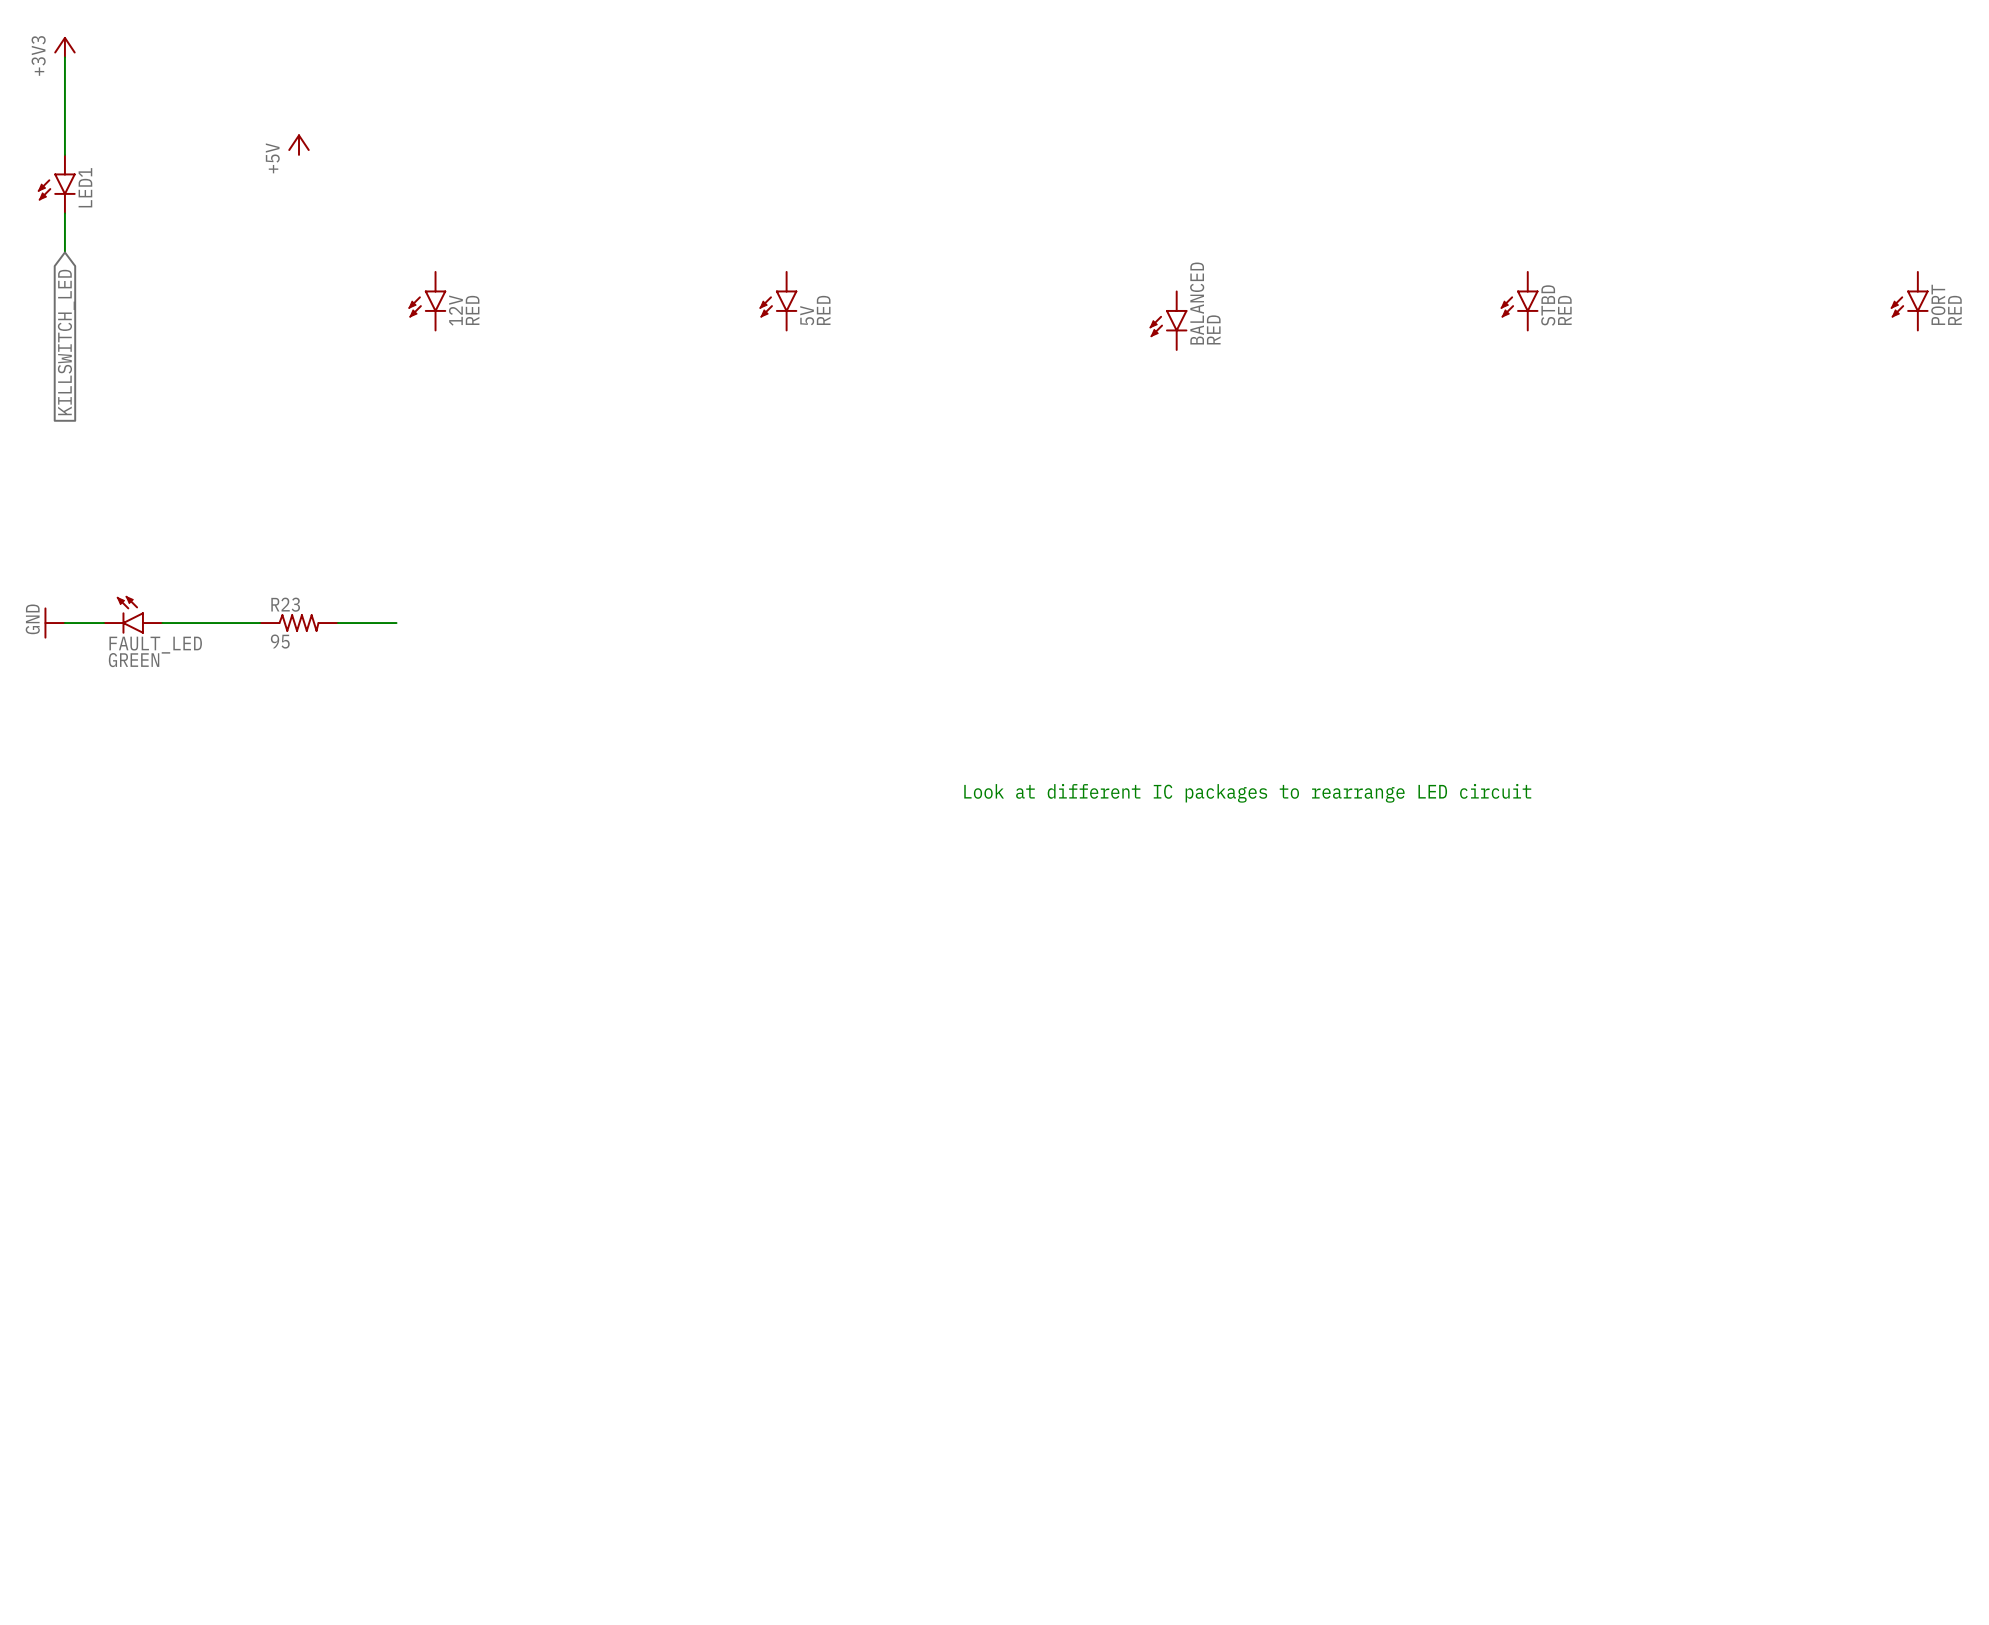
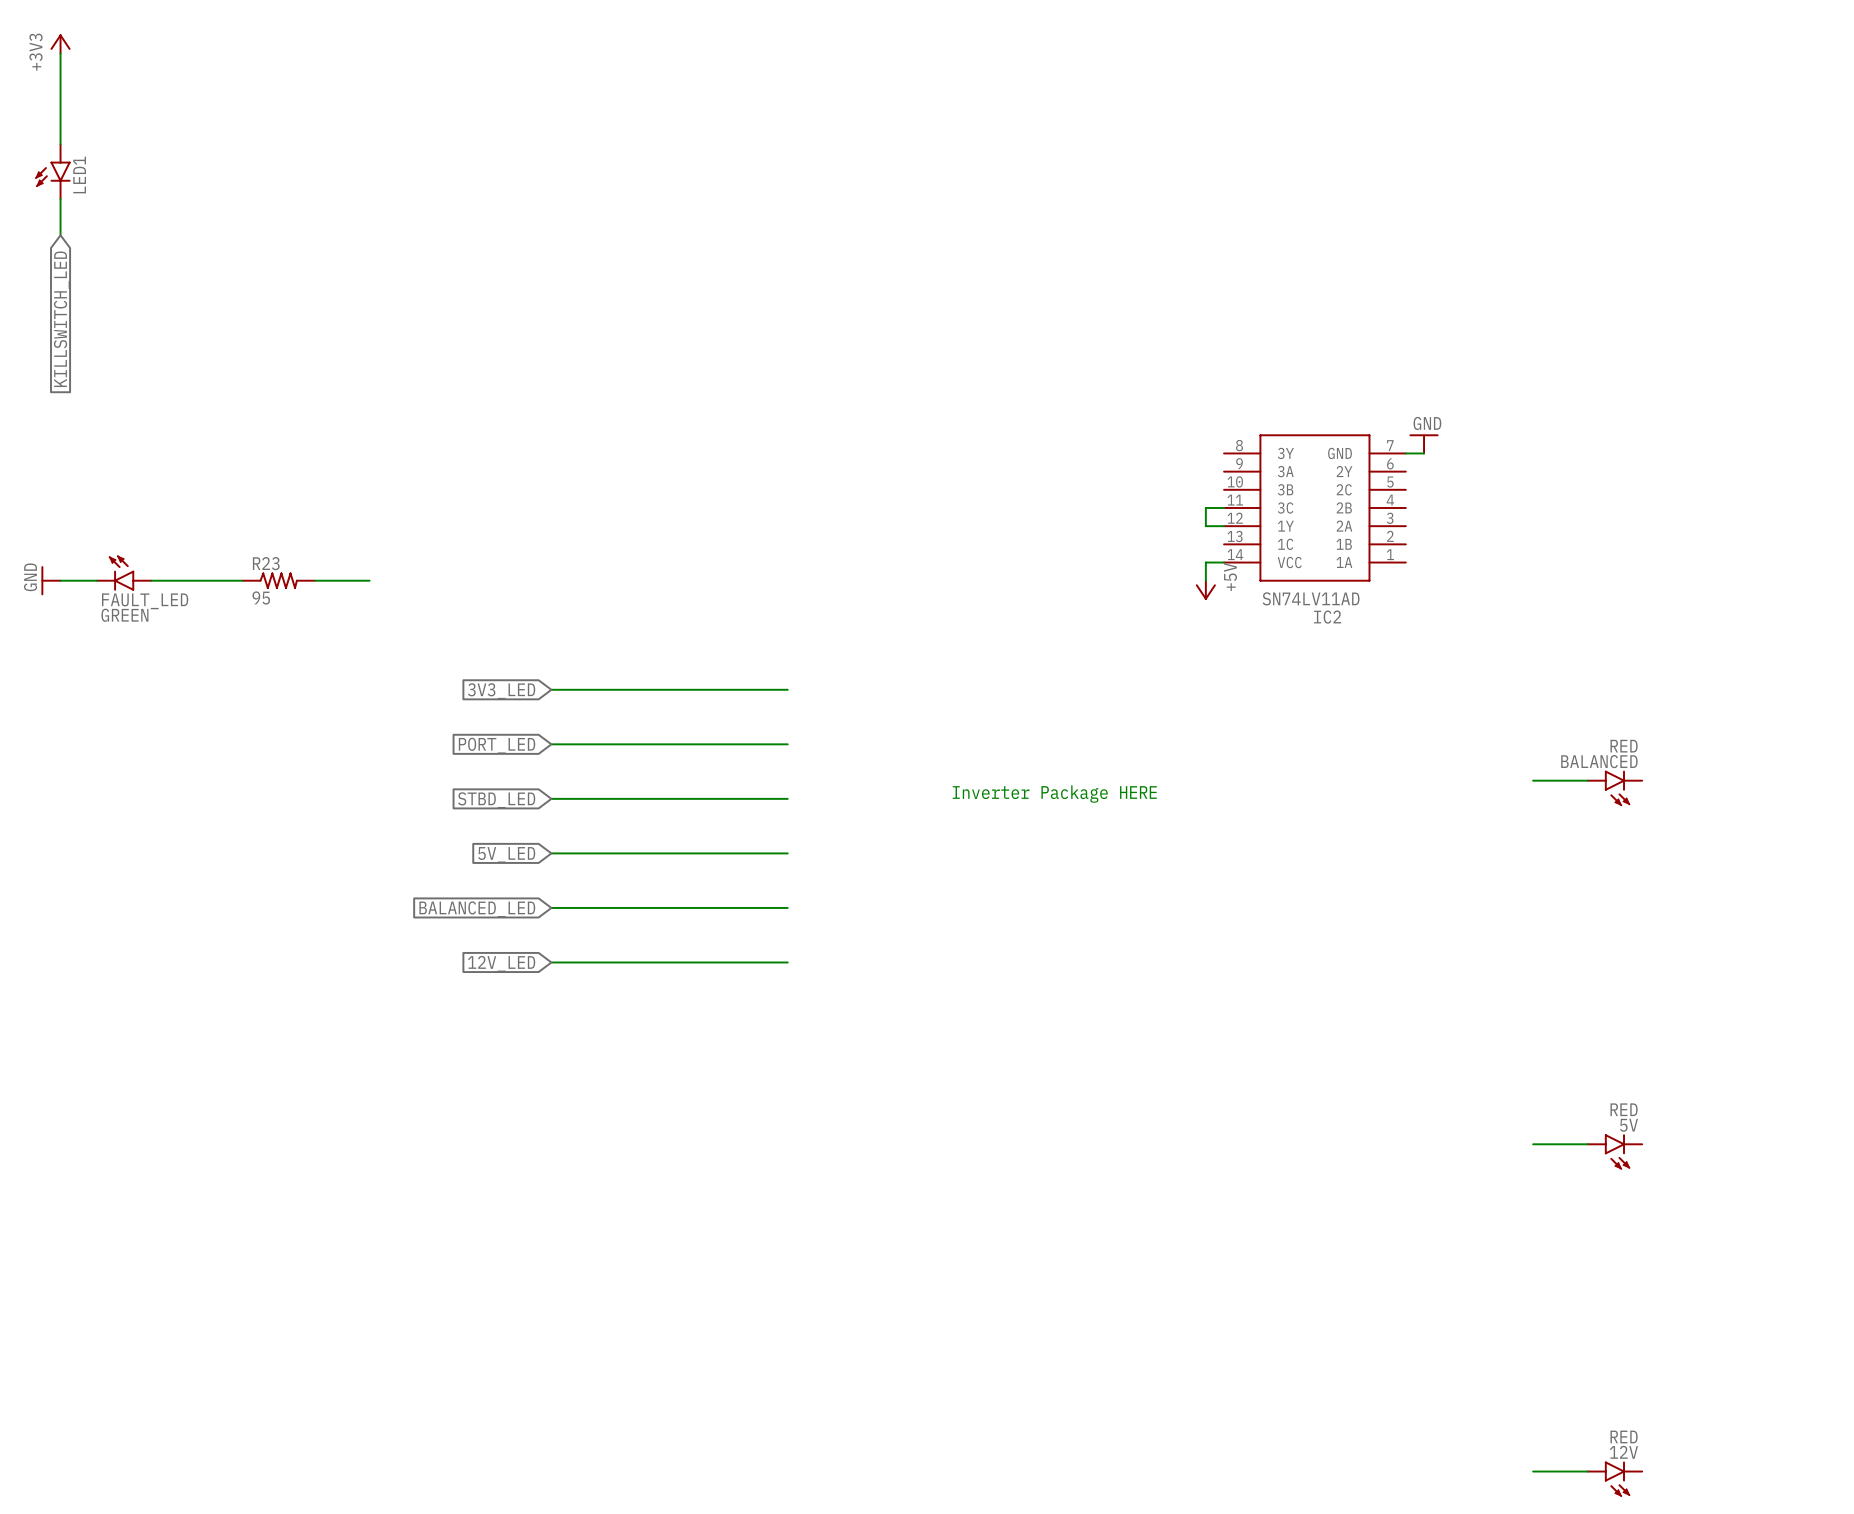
power symbol: +5V (299, 144) -> none
12V position: (427, 301) -> (1614, 1479)
5V position: (778, 301) -> (1614, 1151)
STBD: RED (1519, 301) -> none
PORT: RED (1909, 301) -> none
12V rotation: 0° (427, 303) -> 90° counterclockwise (1617, 1479)
5V rotation: 0° (778, 303) -> 90° counterclockwise (1617, 1151)
BALANCED: RED (1168, 320) -> none
power symbol: none -> GND (1424, 443)
wire: none -> (1405, 453) (1424, 453)
wire: none -> (1224, 507) (1205, 507) (1205, 526) (1224, 526)
IC2: none -> SN74LV11AD (1314, 507)
wire: none -> (1224, 562) (1205, 562) (1205, 580)
power symbol: none -> +5V (1205, 590)
wire: none -> (551, 689) (787, 689)
global label: none -> 3V3_LED (501, 691)
text: Look at different IC packages to rearrange LED circuit (1247, 793) -> none
wire: none -> (551, 744) (787, 744)
global label: none -> PORT_LED (497, 745)
wire: none -> (1533, 780) (1587, 780)
BALANCED: none -> RED (1614, 788)
text: none -> Inverter Package HERE (1054, 794)
wire: none -> (551, 798) (787, 798)
global label: none -> STBD_LED (496, 800)
wire: none -> (551, 853) (787, 853)
global label: none -> 5V_LED (506, 854)
wire: none -> (551, 907) (787, 907)
global label: none -> BALANCED_LED (477, 909)
wire: none -> (551, 962) (787, 962)
global label: none -> 12V_LED (501, 963)
wire: none -> (1533, 1144) (1587, 1144)
wire: none -> (1533, 1471) (1587, 1471)

